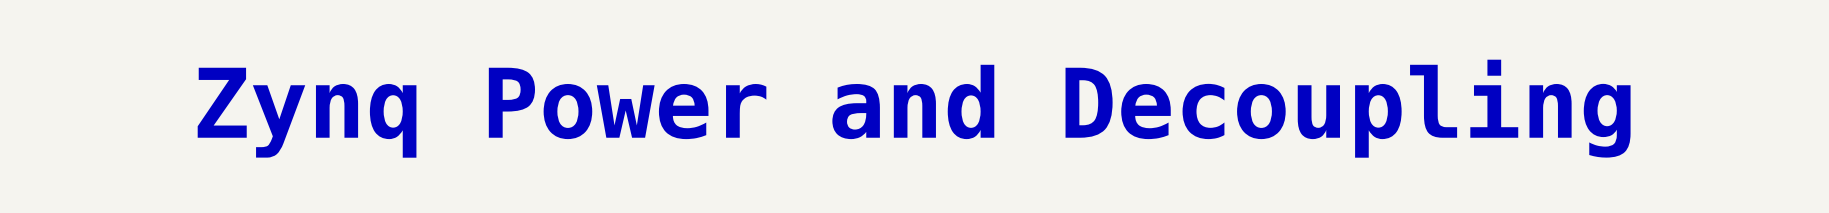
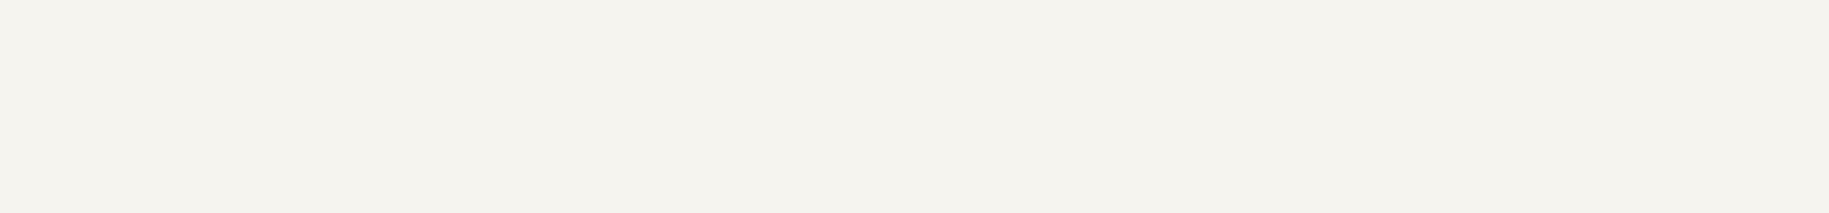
text: Zynq Power and Decoupling (914, 108) -> none

